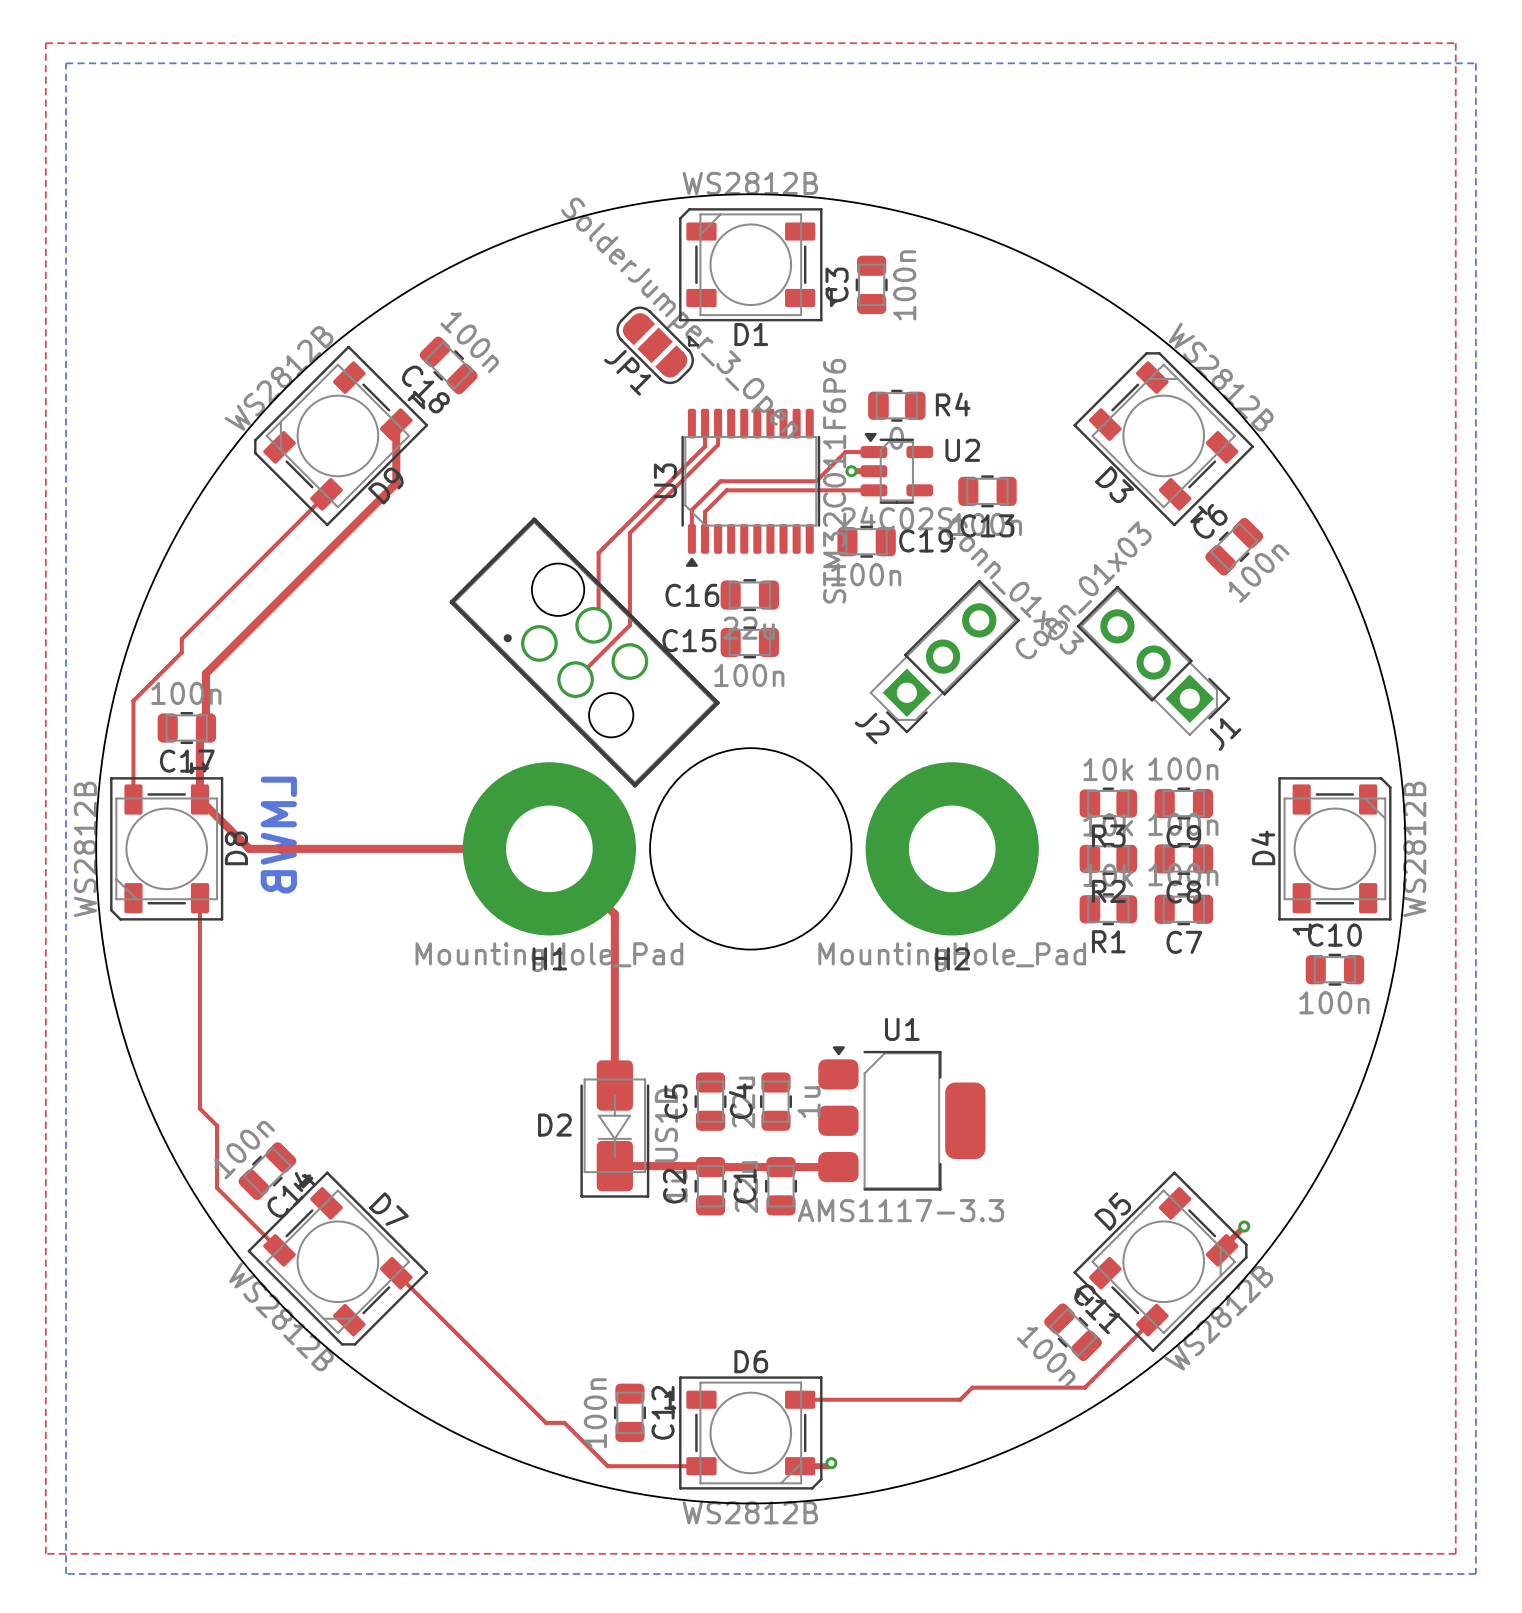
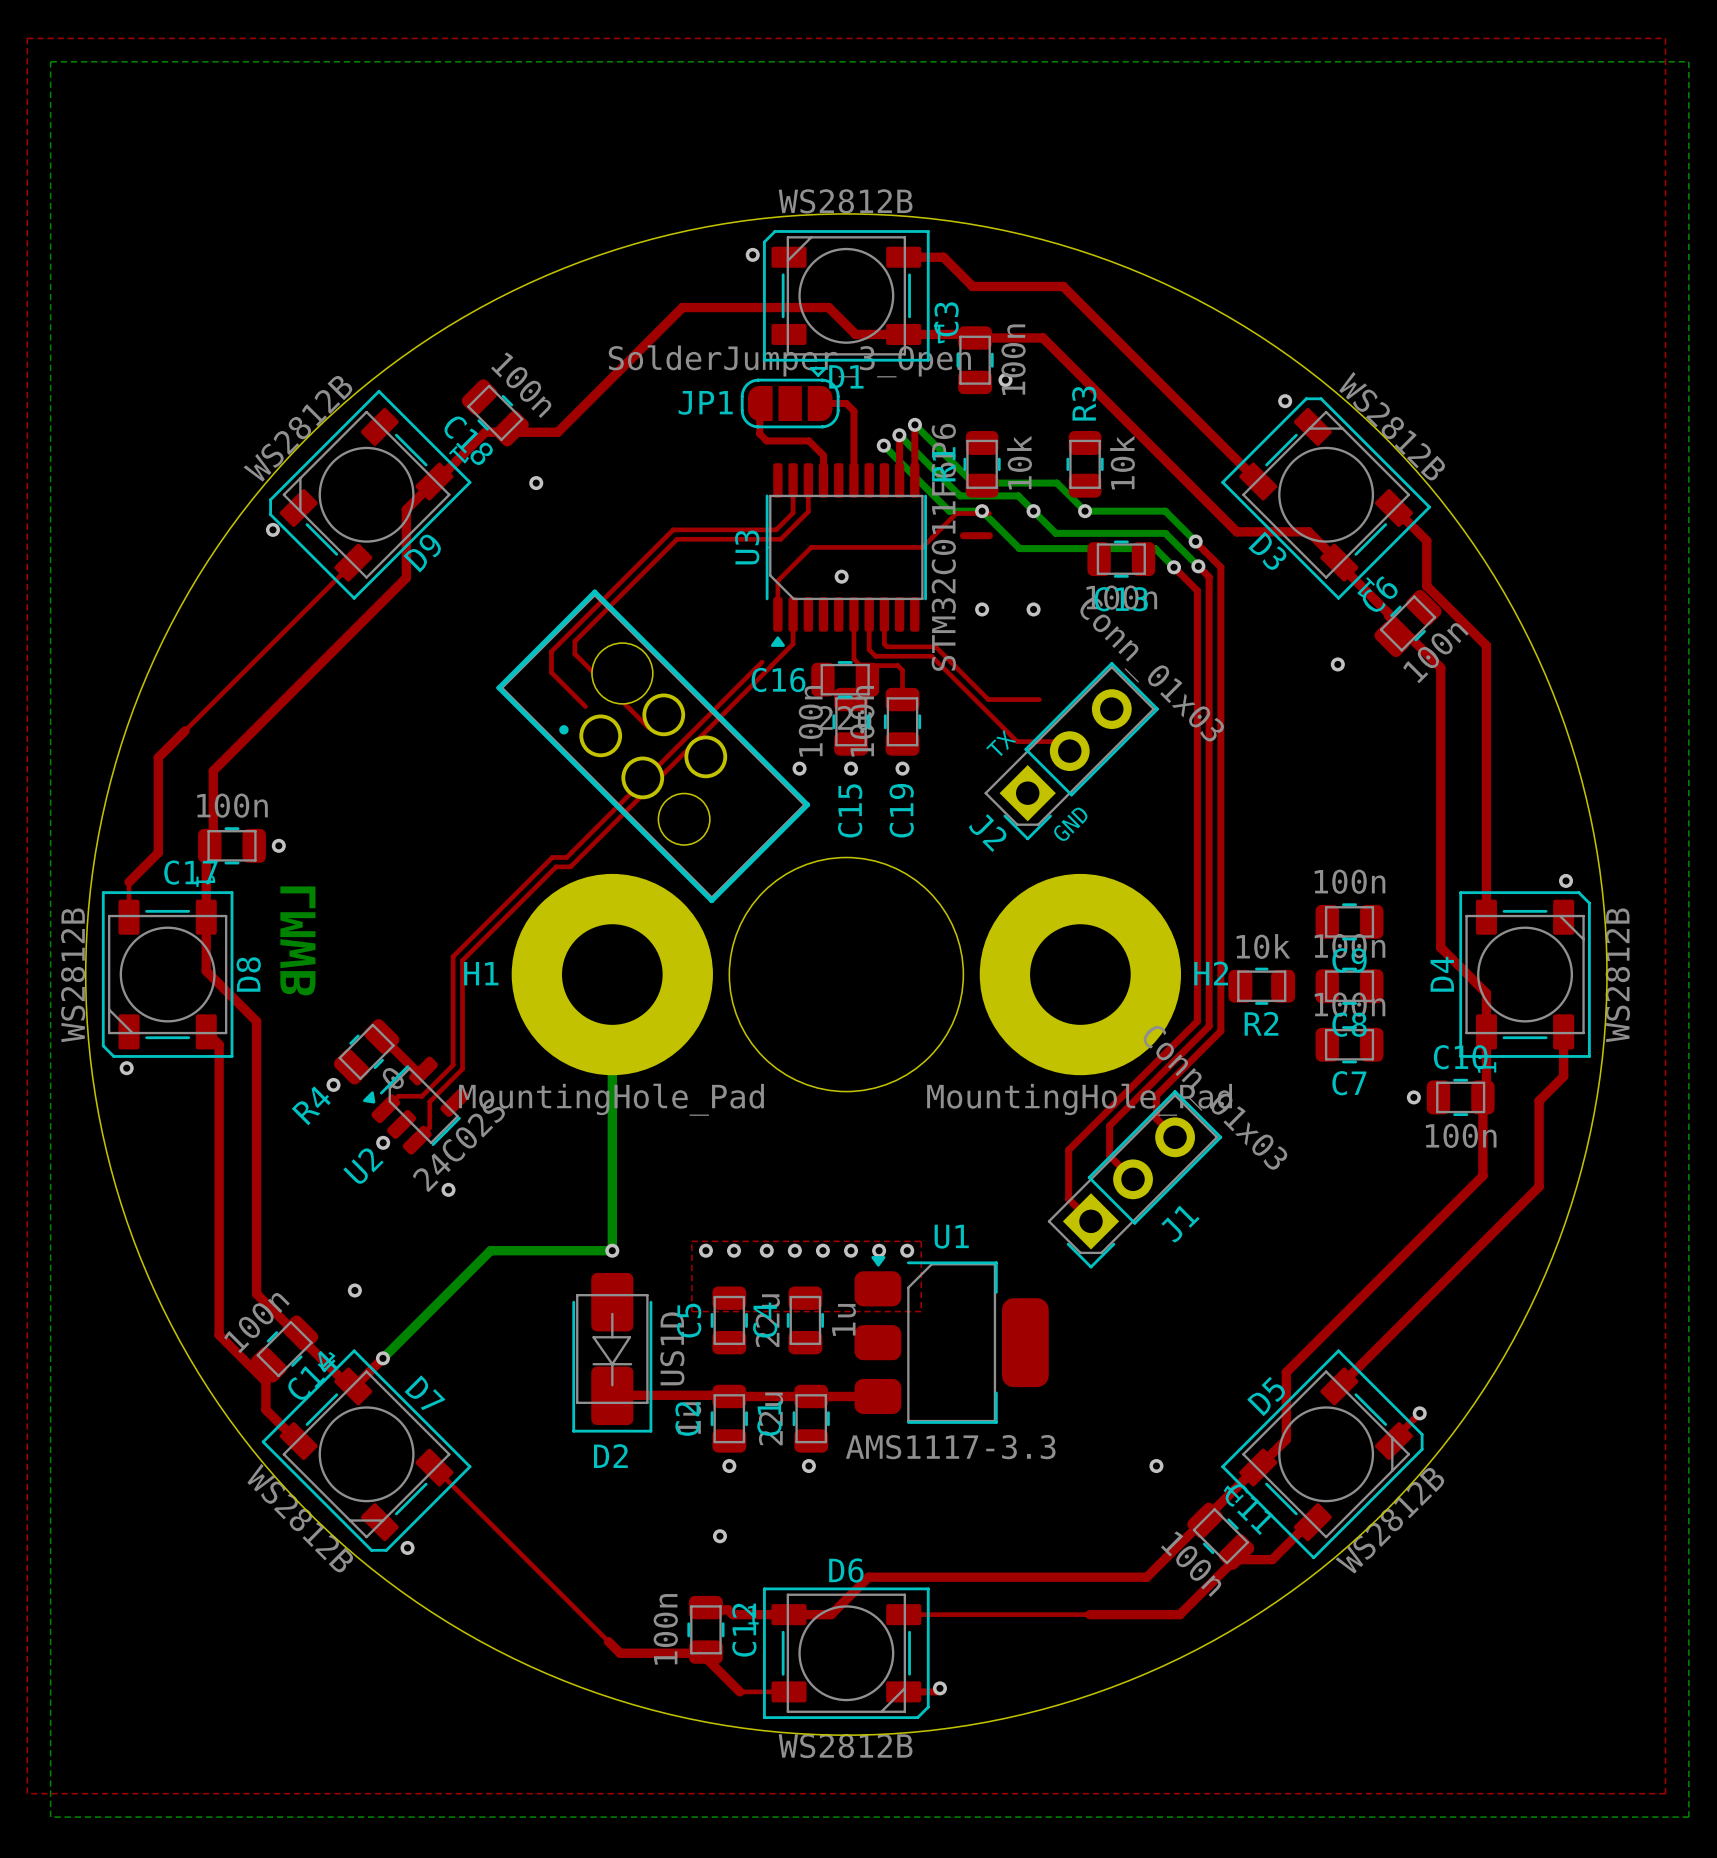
via: none -> (752, 254)
top track: none -> (903, 257) (943, 257) (972, 286) (1063, 286) (1258, 481)
C3 position: (871, 284) -> (975, 360)
via: none -> (1005, 380)
JP1 rotation: 0° (657, 345) -> 45° counterclockwise (790, 397)
via: none -> (1285, 401)
top track: none -> (759, 403) (759, 433) (766, 440) (808, 440) (823, 455) (823, 480)
top track: none -> (820, 403) (846, 403) (853, 411) (853, 480)
JP1 name position: JP1 (627, 372) -> JP1 (705, 402)
top track: none -> (914, 425) (914, 480)
bottom track: none -> (914, 424) (973, 483) (1056, 483) (1085, 511) (1165, 511) (1195, 541)
via: none -> (914, 424)
top track: none -> (899, 435) (899, 480)
bottom track: none -> (899, 435) (960, 495) (1018, 495) (1055, 533) (1165, 533) (1198, 566)
via: none -> (899, 435)
bottom track: none -> (883, 445) (949, 511) (982, 511) (1019, 548) (1155, 548) (1174, 567)
via: none -> (883, 445)
R4 name position: R4 (953, 404) -> R4 (311, 1105)
R4 rotation: 0° (896, 405) -> 45° counterclockwise (366, 1051)
R4 position: (896, 405) -> (366, 1051)
top track: (396, 424) (396, 483) (372, 507) -> (719, 1609) (728, 1609) (732, 1614) (831, 1614) (868, 1577) (1146, 1577) (1286, 1439) (1286, 1372) (1482, 1175) (1482, 1097) (1486, 1093) (1486, 993) (1440, 947) (1440, 667) (1308, 531) (1236, 531) (1042, 337) (975, 337) (971, 334) (855, 334) (828, 307) (682, 307) (557, 432) (485, 432) (406, 509) (406, 577)
via: none -> (536, 483)
top track: (718, 444) (629, 532) (629, 625) (575, 679) -> (808, 505) (808, 511) (780, 539) (677, 539) (574, 641) (574, 653) (648, 727)
top track: (704, 446) (598, 552) (598, 620) (593, 625) -> (793, 507) (793, 512) (776, 529) (673, 529) (551, 651) (551, 672) (585, 706)
top track: none -> (1393, 508) (1426, 540) (1426, 586) (1486, 645) (1486, 917)
via: none -> (1033, 511)
via: none -> (1085, 511)
U2 name position: U2 (962, 450) -> U2 (363, 1166)
via: none -> (272, 529)
U2 rotation: 0° (896, 468) -> 45° counterclockwise (416, 1105)
U2 position: (896, 468) -> (416, 1105)
via position: (851, 471) -> (982, 511)
top track: none -> (1195, 541) (1220, 567) (1220, 1031) (1156, 1095) (1156, 1118) (1175, 1137)
via: none -> (1195, 541)
top track: (873, 490) (726, 490) (704, 511) (704, 538) -> (771, 665) (793, 643) (793, 614)
top track: none -> (1198, 566) (1209, 577) (1209, 1026) (1109, 1125) (1109, 1155) (1133, 1179)
via: none -> (1198, 566)
top track: none -> (1174, 567) (1197, 590) (1197, 1021) (1068, 1150) (1068, 1199) (1091, 1221)
via: none -> (1174, 567)
via: none -> (841, 576)
via: none -> (982, 609)
via: none -> (1033, 609)
top track: none -> (853, 614) (853, 659) (860, 665) (897, 665) (902, 670) (902, 699)
top track: none -> (869, 614) (869, 649) (875, 656) (931, 656) (1017, 741) (1081, 741)
top track: none -> (884, 614) (884, 643) (887, 646) (935, 646) (988, 699) (1039, 699)
C19 rotation: 0° (866, 541) -> 90° clockwise (902, 721)
C19 position: (866, 541) -> (902, 721)
top track: none -> (762, 662) (566, 857) (552, 857) (453, 956) (453, 1065) (422, 1096) (398, 1096) (385, 1108)
via: none -> (1337, 664)
top track: none -> (771, 665) (570, 866) (556, 866) (462, 960) (462, 1069) (429, 1101) (429, 1127) (417, 1140)
top track: (181, 639) (181, 652) (133, 700) (133, 769) -> (185, 730) (158, 757) (158, 852) (129, 882)
C15 name position: C15 (689, 640) -> C15 (850, 810)
C15 rotation: 0° (749, 642) -> 90° clockwise (851, 721)
text: none -> TX (1001, 742)
J1 rotation: 0° (1153, 660) -> 90° clockwise (1134, 1179)
J1 position: (1153, 660) -> (1134, 1179)
via: none -> (799, 768)
via: none -> (851, 768)
via: none -> (902, 768)
text: none -> GND (1070, 824)
C17 position: (186, 728) -> (232, 845)
J1 name position: J1 (1225, 734) -> J1 (1180, 1224)
via: none -> (278, 845)
via: none -> (1566, 880)
top track: (199, 799) (249, 848) (549, 848) (614, 914) (614, 1085) -> (206, 917) (206, 971) (256, 1021) (256, 1293) (349, 1386) (354, 1386) (382, 1358)
R3 rotation: 0° (1108, 803) -> 90° clockwise (1085, 464)
R3 position: (1108, 803) -> (1085, 464)
R3 name position: R3 (1108, 836) -> R3 (1084, 403)
bottom track: none -> (612, 974) (612, 1250) (490, 1250) (382, 1358)
top track: (199, 898) (199, 1108) (217, 1125) (217, 1187) (279, 1250) -> (206, 1031) (219, 1044) (219, 1334) (265, 1381) (265, 1409) (298, 1441)
top track: none -> (1563, 1031) (1563, 1076) (1539, 1100) (1539, 1186) (1339, 1386)
top track: none -> (381, 1036) (416, 1071) (423, 1071)
R1 rotation: 0° (1108, 909) -> 90° clockwise (982, 464)
R1 position: (1108, 909) -> (982, 464)
via: none -> (126, 1068)
via: none -> (333, 1084)
via: none -> (1413, 1097)
H1 name position: H1 (549, 958) -> H1 (481, 973)
H2 name position: H2 (952, 958) -> H2 (1211, 973)
C10 position: (1334, 969) -> (1460, 1097)
via: none -> (383, 1142)
via: none -> (448, 1189)
top zone outline: none -> (691, 1241) (921, 1241) (921, 1311) (691, 1311) (691, 1241)
via: none -> (612, 1250)
via: none -> (705, 1250)
via: none -> (734, 1250)
via: none -> (766, 1250)
via: none -> (794, 1250)
via: none -> (822, 1250)
via: none -> (851, 1250)
via: none -> (879, 1250)
via: none -> (907, 1250)
C5 position: (710, 1101) -> (729, 1320)
C4 position: (775, 1101) -> (805, 1320)
U1 position: (901, 1118) -> (951, 1339)
via: none -> (354, 1290)
D2 name position: D2 (554, 1125) -> D2 (610, 1456)
D2 position: (614, 1129) -> (612, 1352)
top track: (614, 1166) (838, 1167) -> none
via: none -> (382, 1358)
C2 position: (710, 1186) -> (729, 1418)
C1 position: (781, 1186) -> (811, 1418)
top track: none -> (612, 1395) (877, 1396)
via: none -> (729, 1466)
via: none -> (808, 1466)
via: none -> (1156, 1466)
top track: (1152, 1320) (1084, 1387) (972, 1387) (960, 1399) -> (1312, 1522) (1309, 1522) (1272, 1559) (1234, 1559) (1179, 1614) (1089, 1614)
via: none -> (719, 1536)
via: none -> (407, 1547)
top track: (546, 1422) (564, 1422) (607, 1466) (659, 1466) -> (608, 1641) (620, 1653) (701, 1653) (739, 1691)

